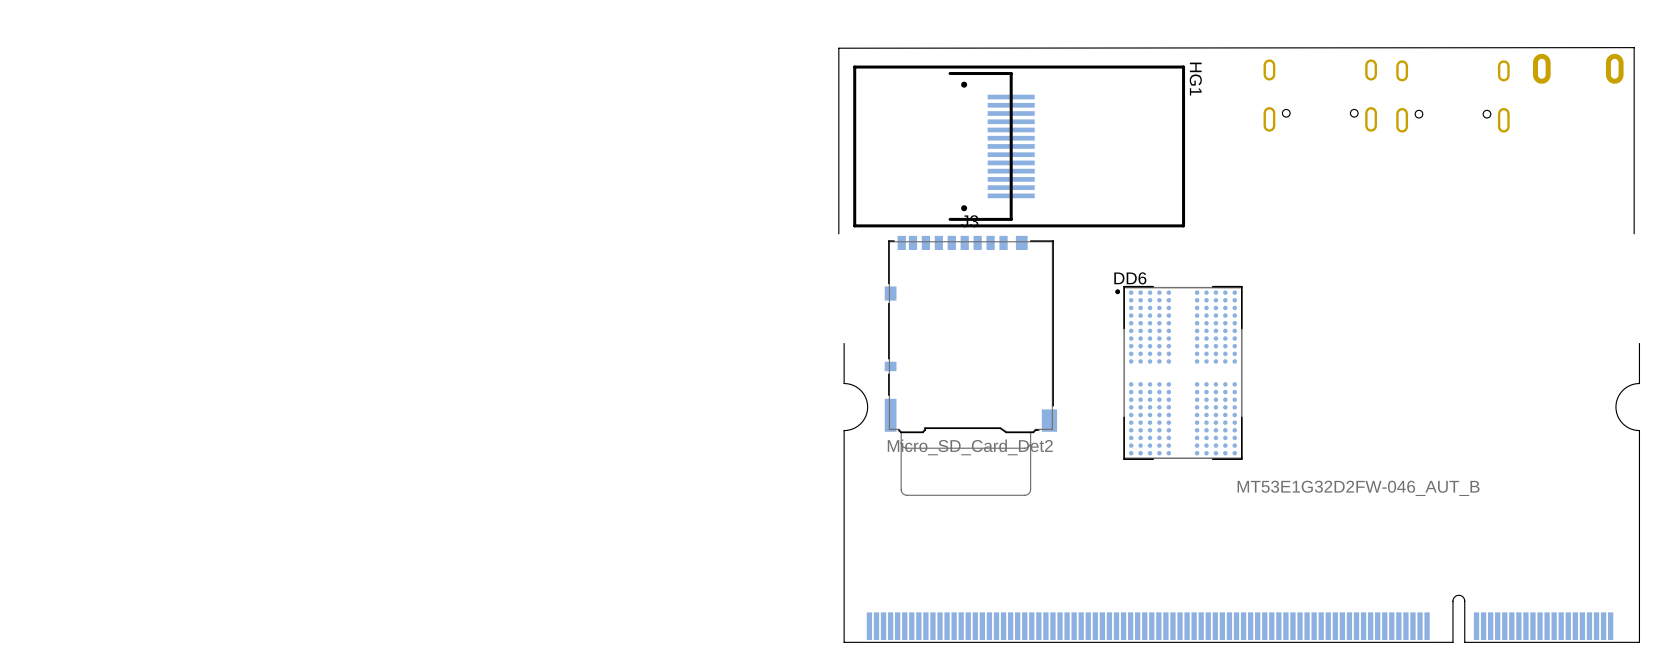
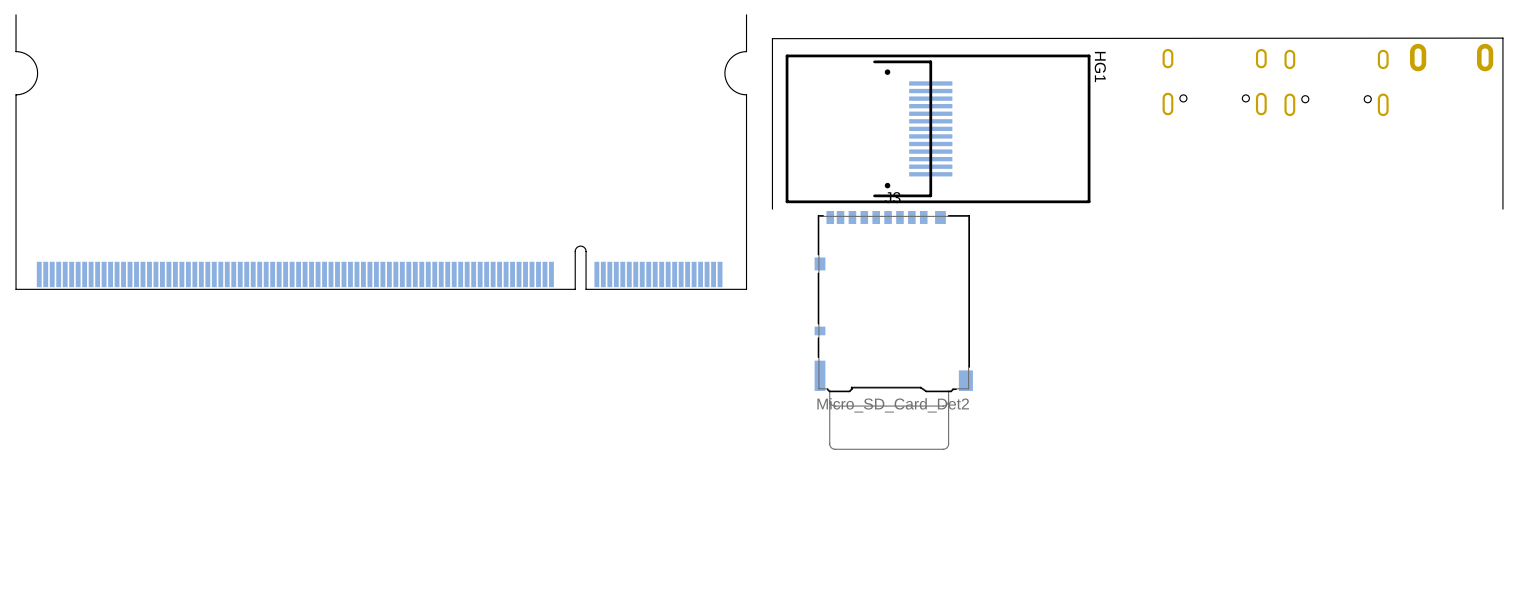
part: none -> (381, 152)
DD6: MT53E1G32D2FW-046_AUT_B (1178, 372) -> none
part: (1241, 492) -> none

